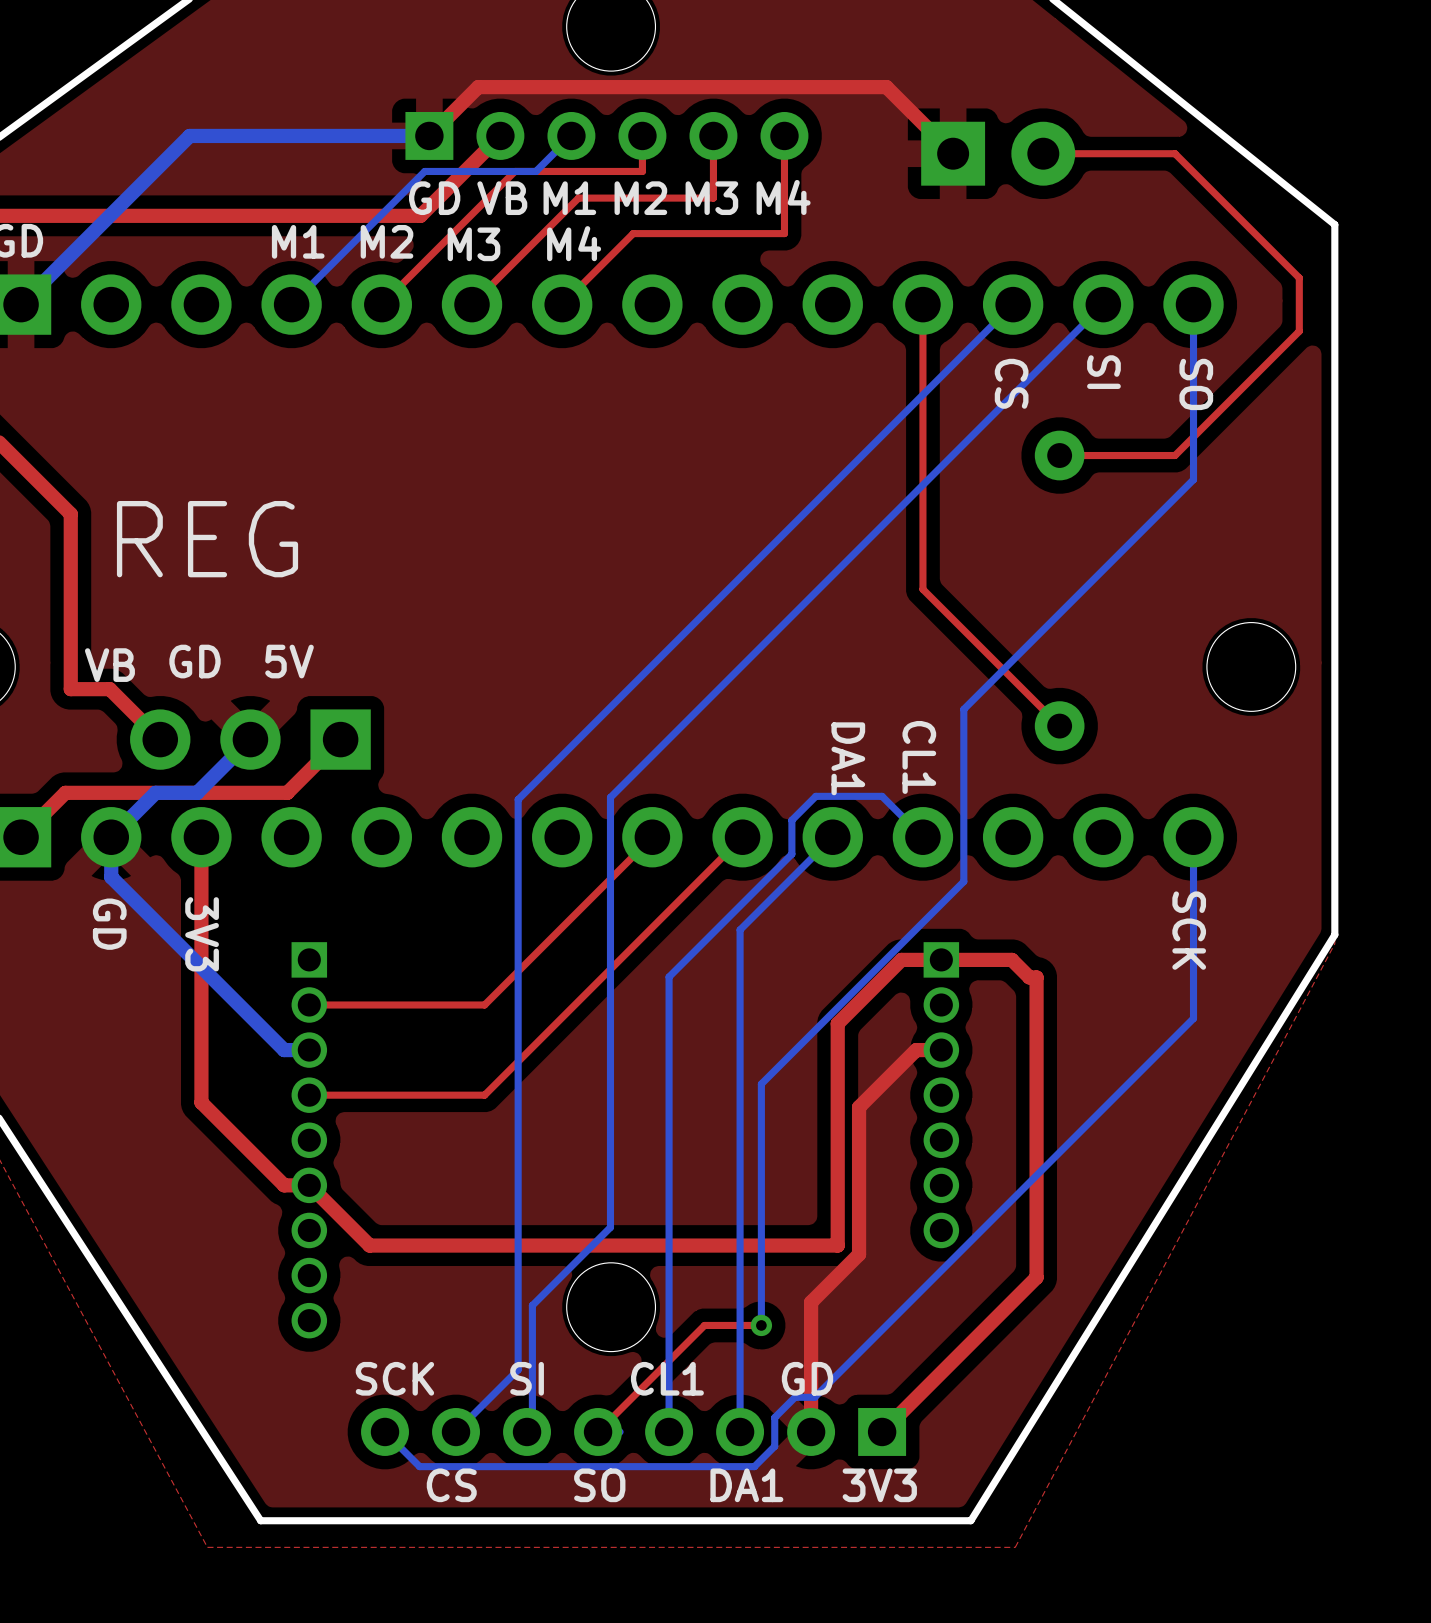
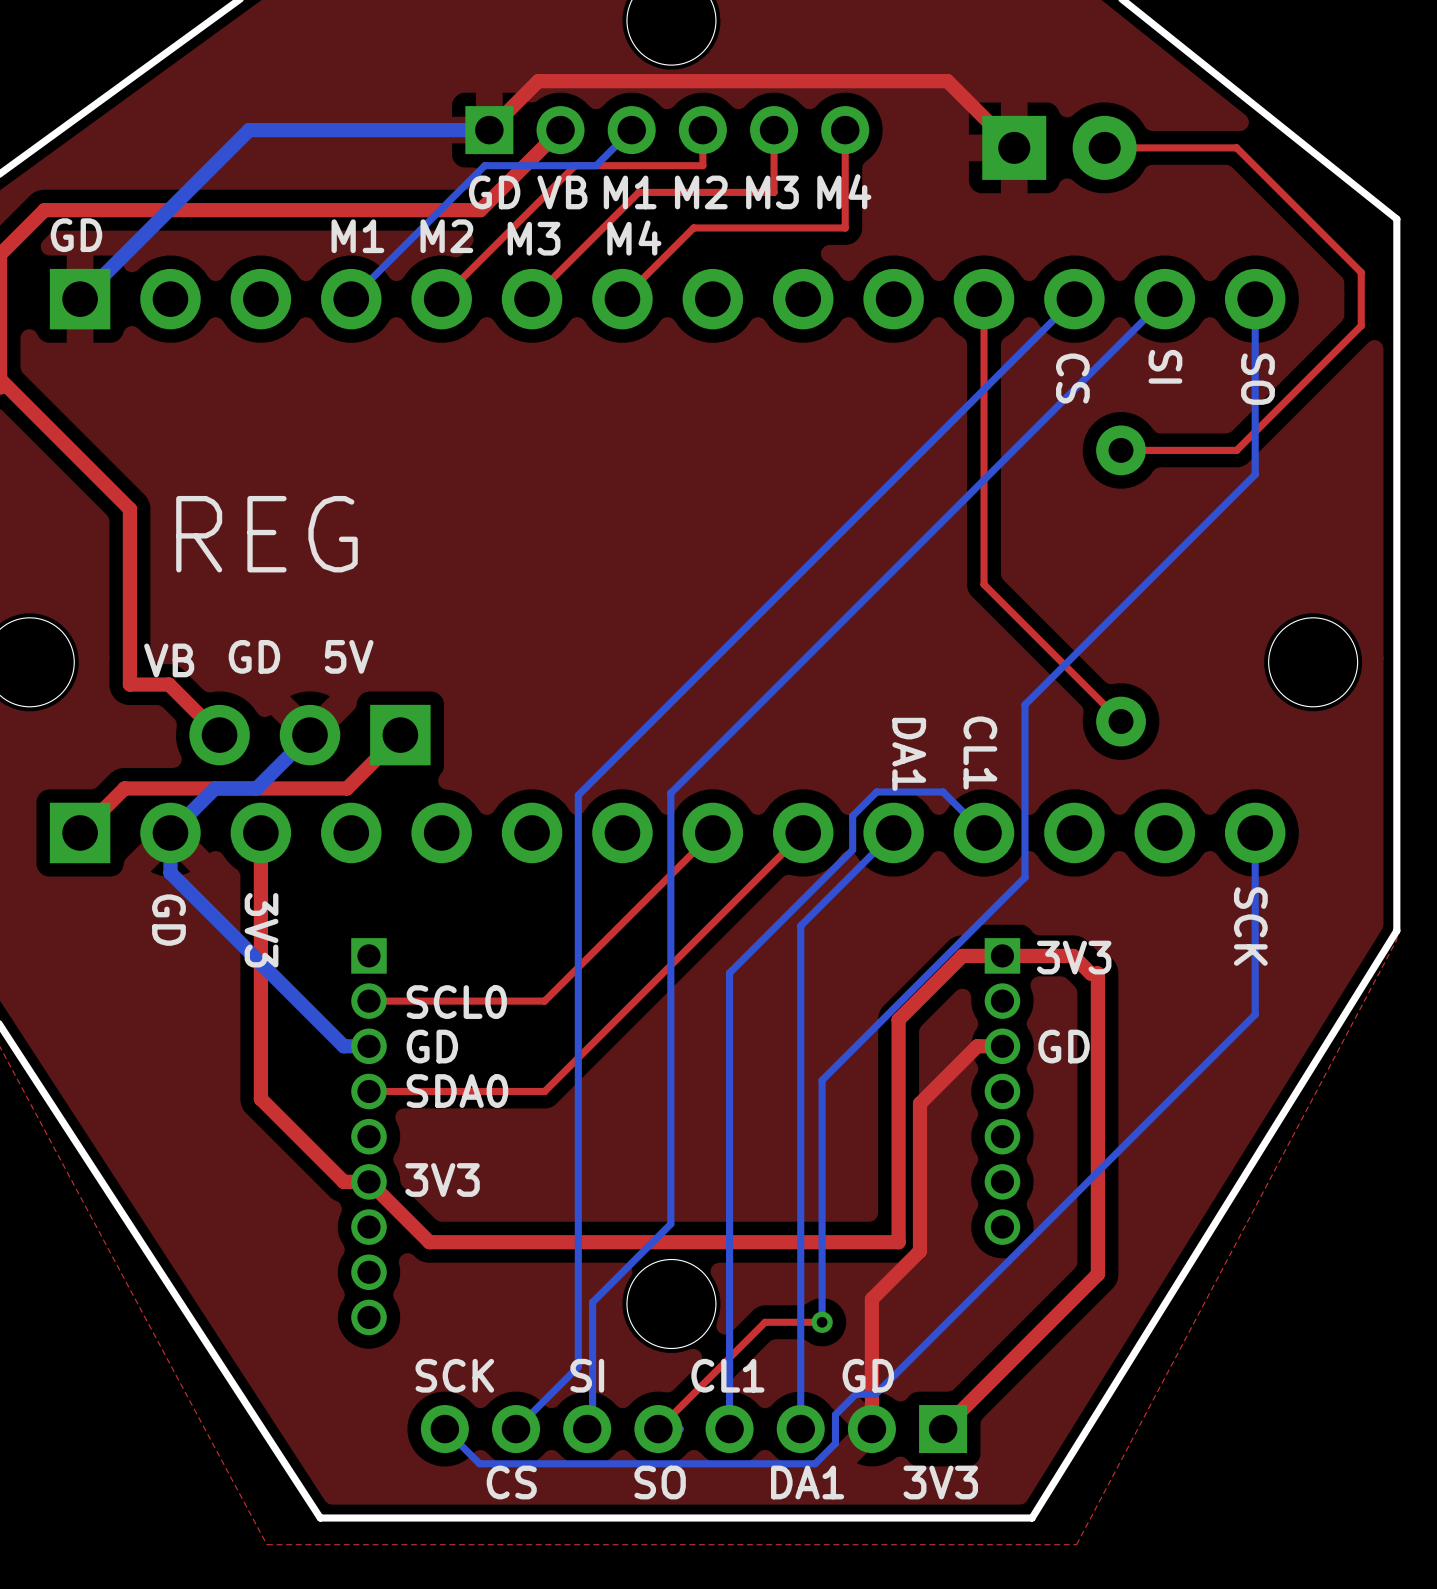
text: none -> 3V3 (1074, 957)
text: none -> SCL0 (456, 1002)
text: none -> GD (432, 1046)
text: none -> GD (1064, 1046)
text: none -> SDA0 (457, 1091)
text: none -> 3V3 (442, 1180)

